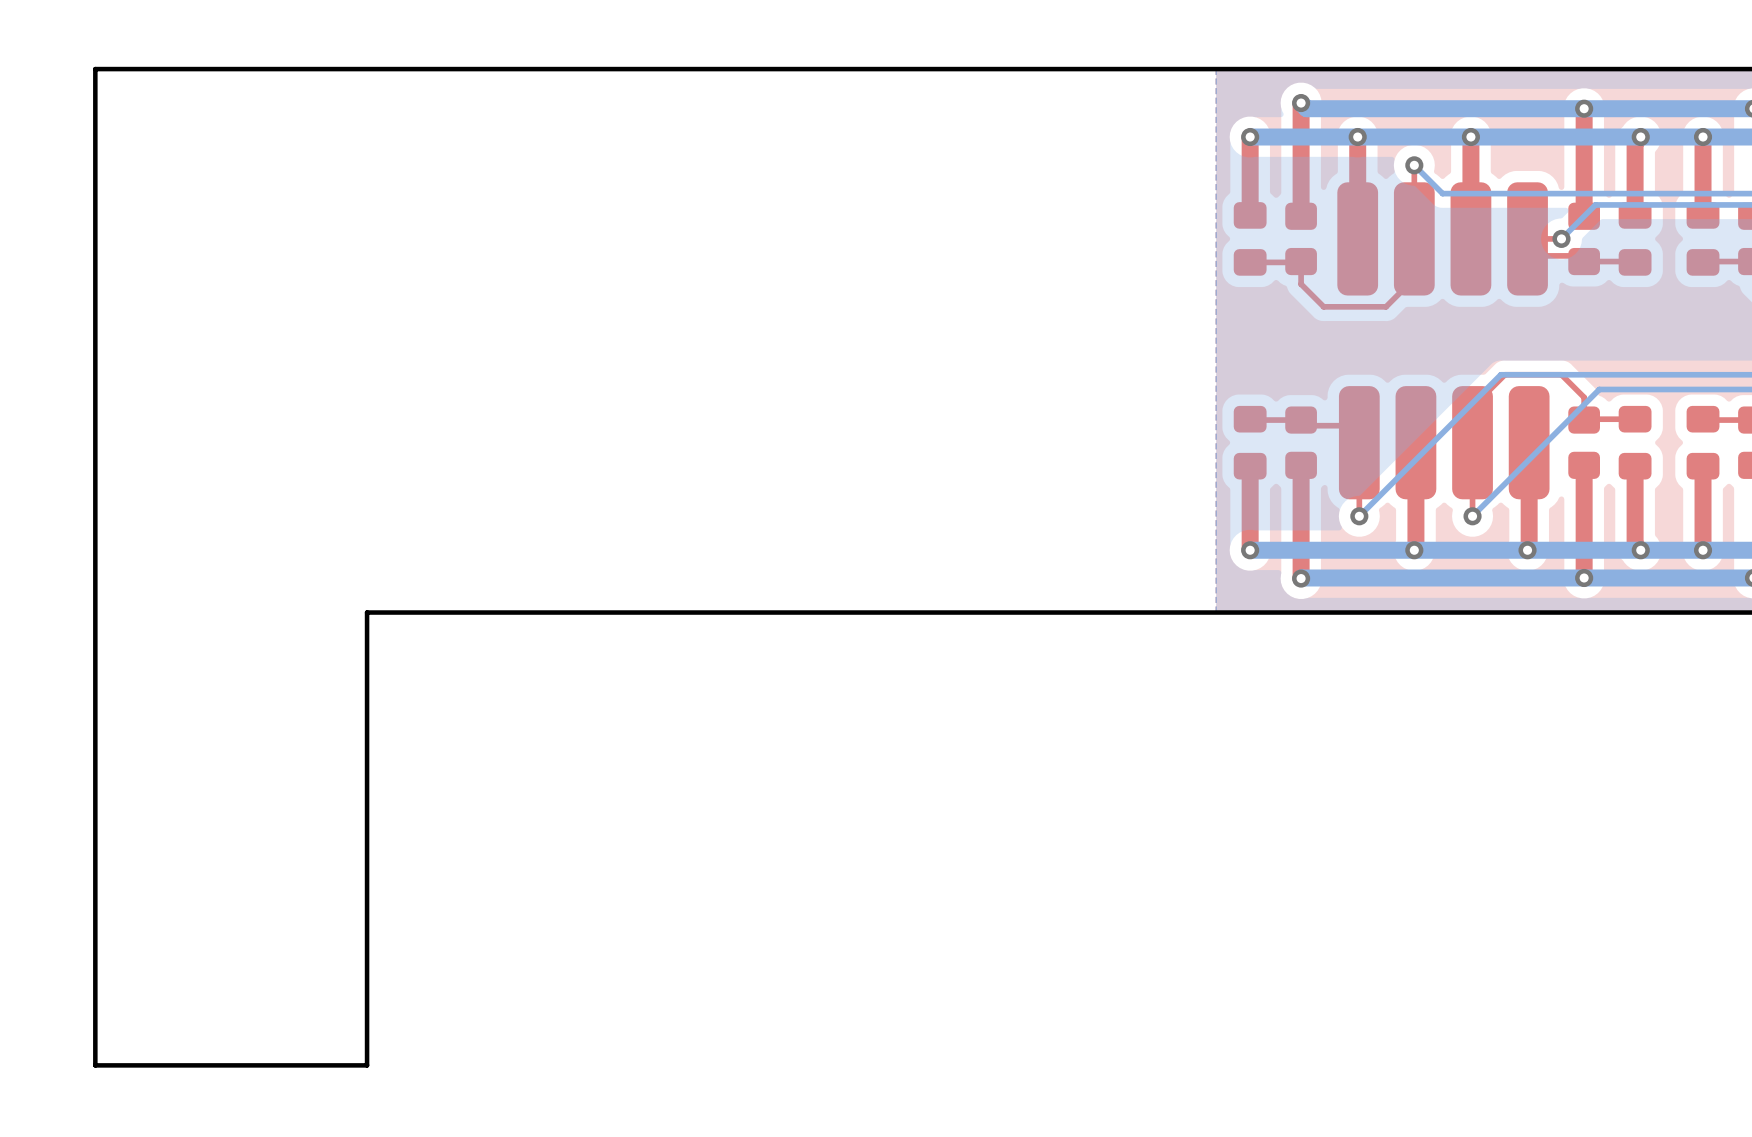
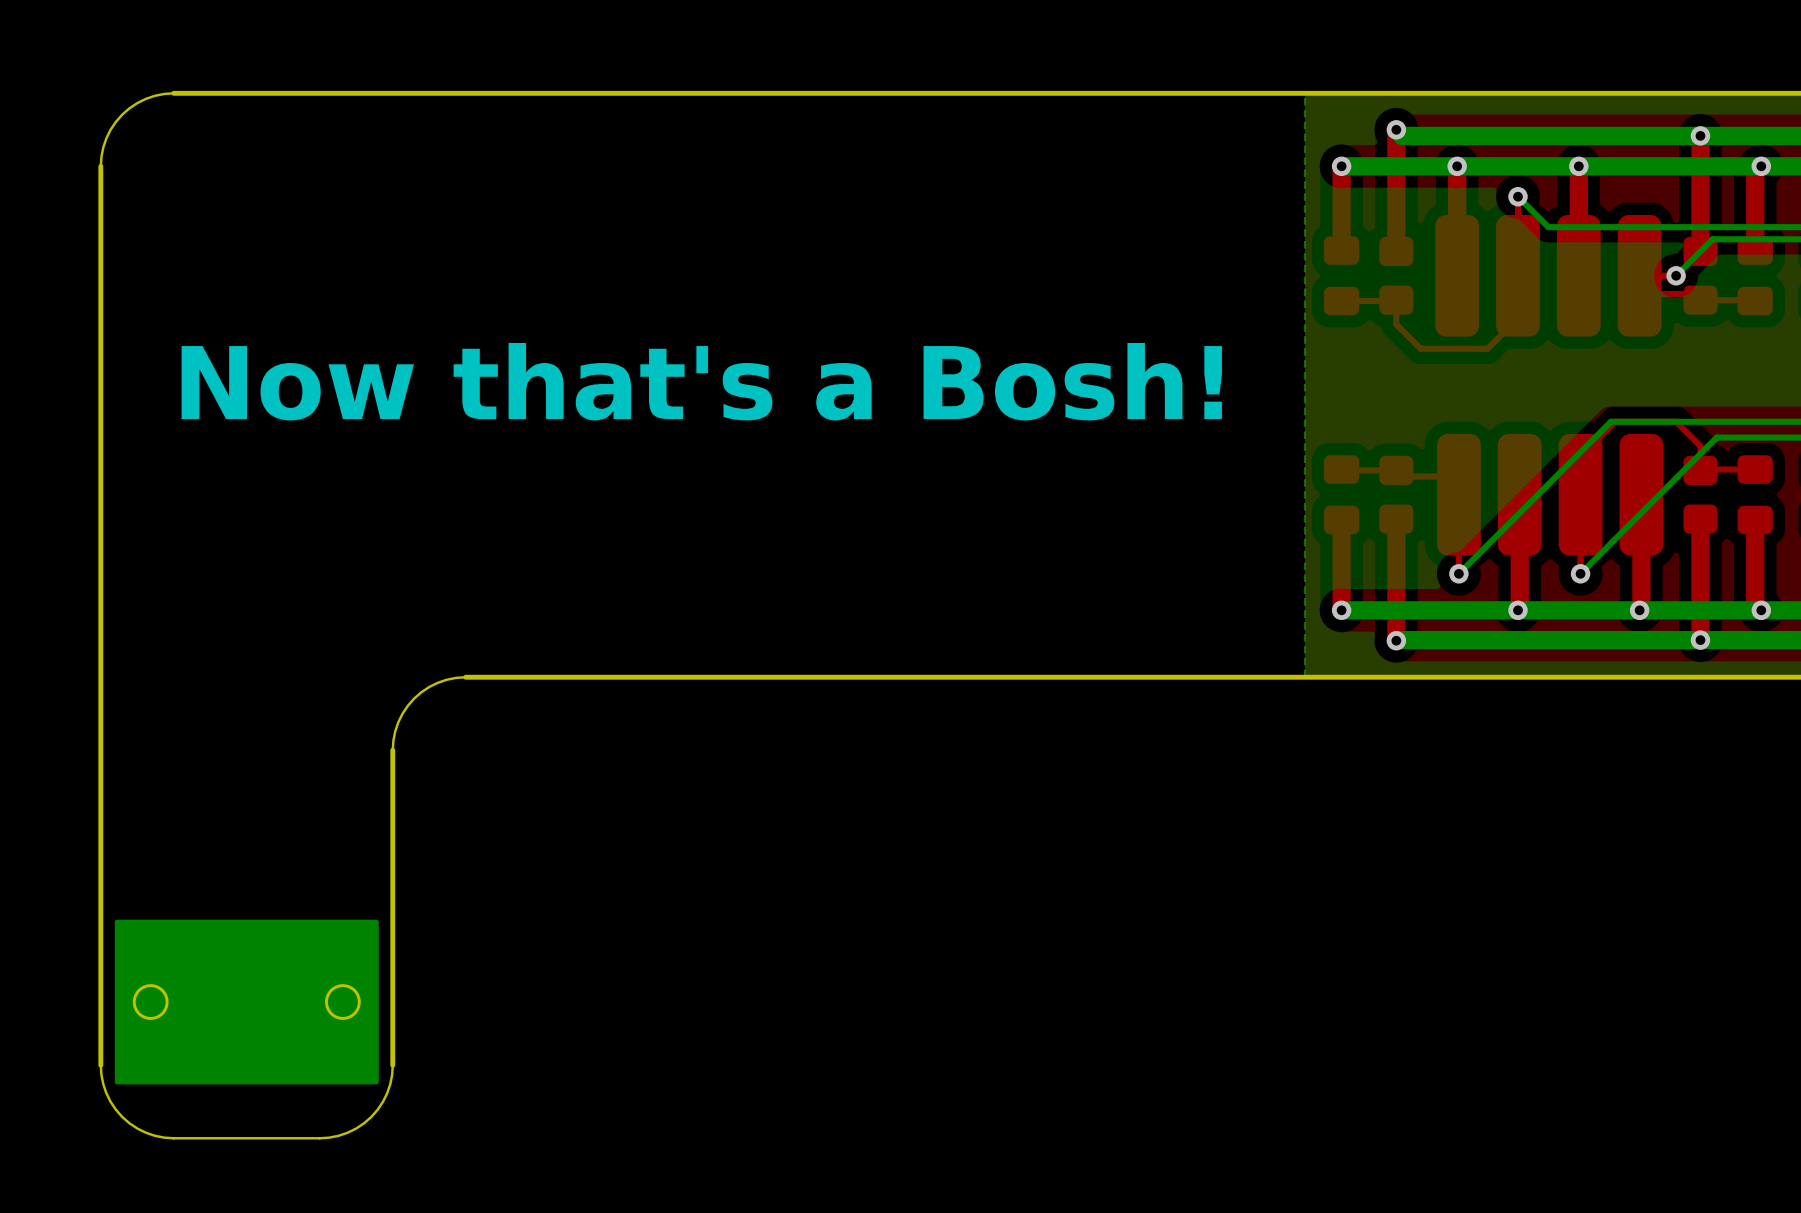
board edge: (163, 69) (95, 69) (95, 137) -> (173, 93) (145, 98) (122, 114) (106, 138) (100, 166)
text: none -> Now that's a Bosh! (701, 381)
board edge: (434, 612) (367, 612) (367, 680) -> (465, 677) (437, 682) (414, 698) (398, 722) (392, 750)
drawing: none -> [114, 919, 379, 1085]
board edge: (367, 973) (367, 1065) (95, 1065) (95, 973) -> (392, 1065) (387, 1093) (371, 1116) (347, 1132) (319, 1138) (173, 1138) (154, 1135) (129, 1123) (115, 1109) (106, 1093) (100, 1065)

